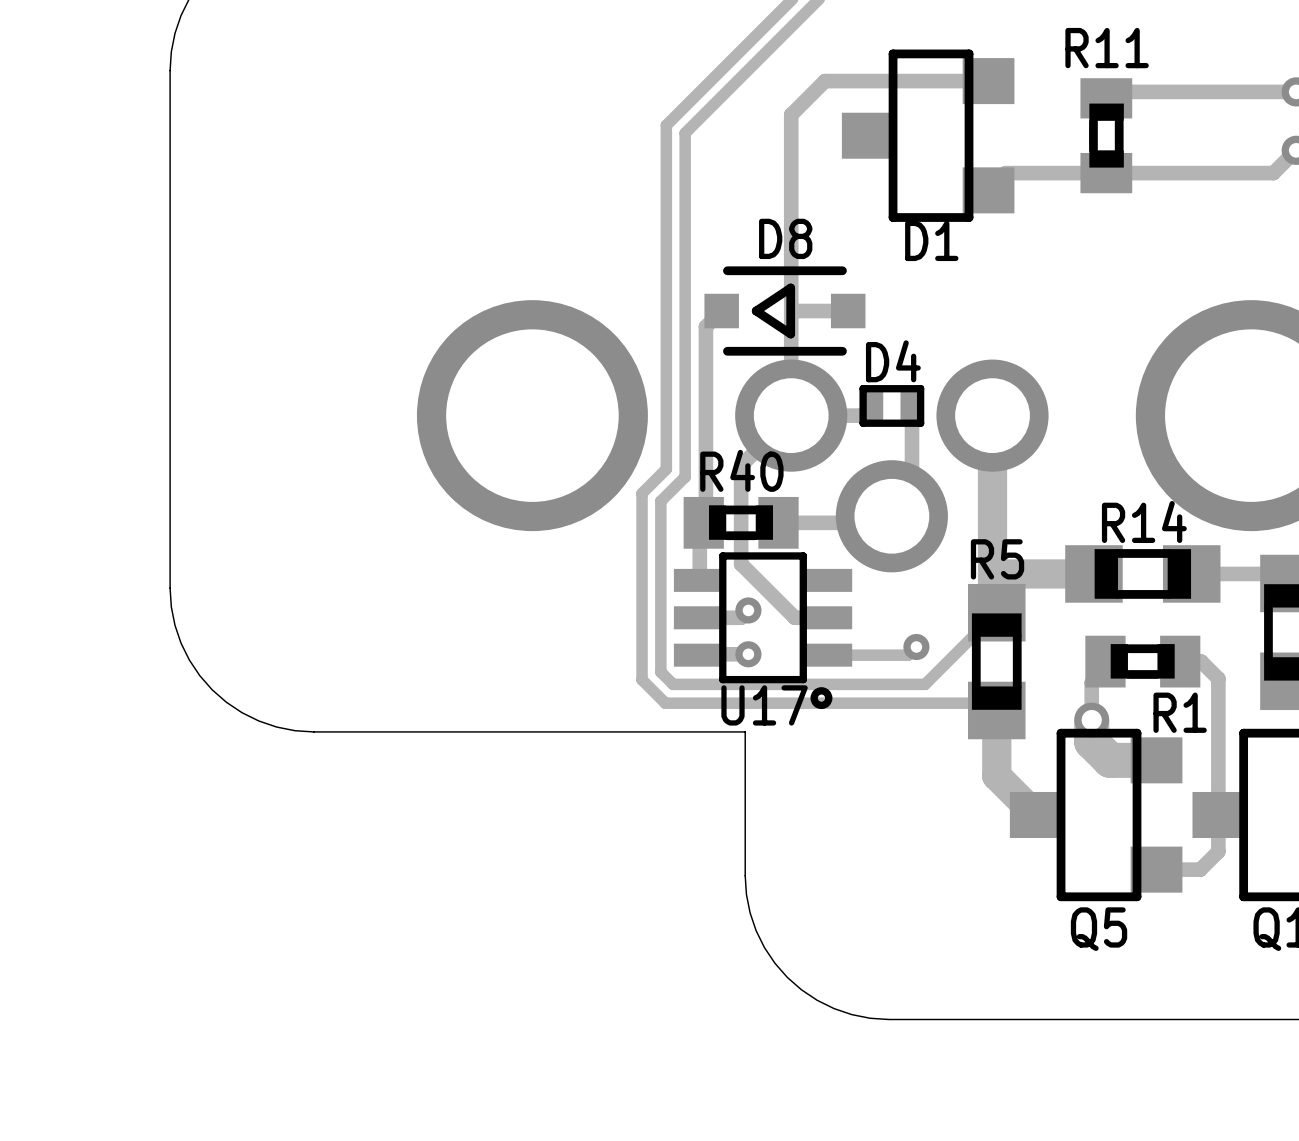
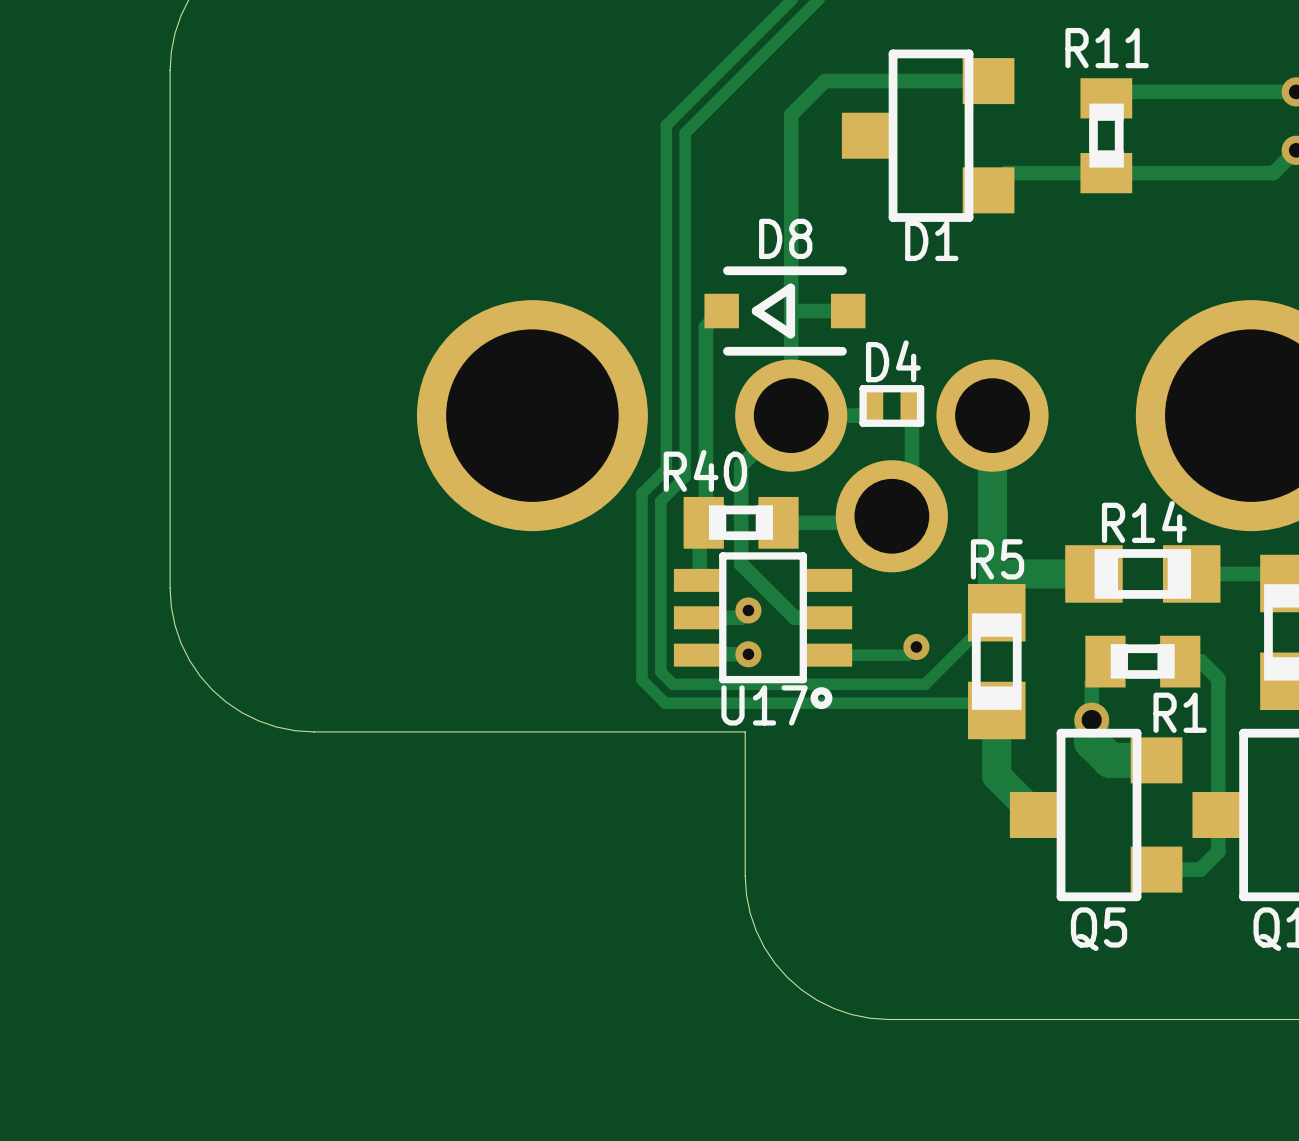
R40 name position: R40 (741, 470) -> R40 (705, 470)

